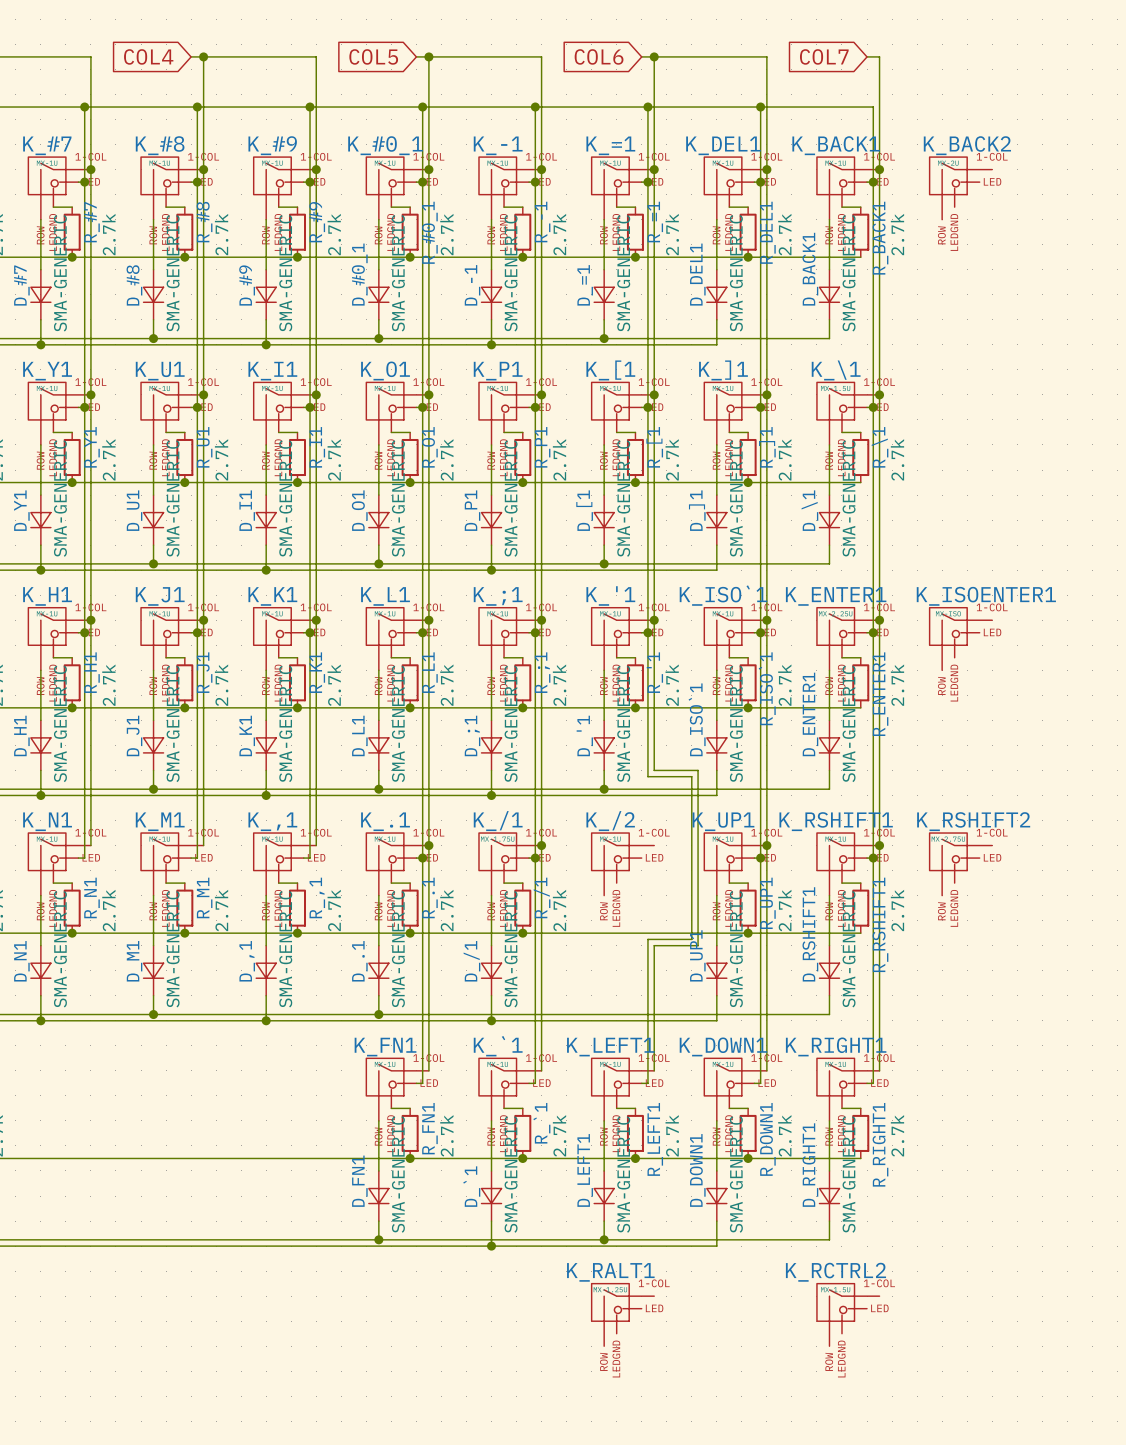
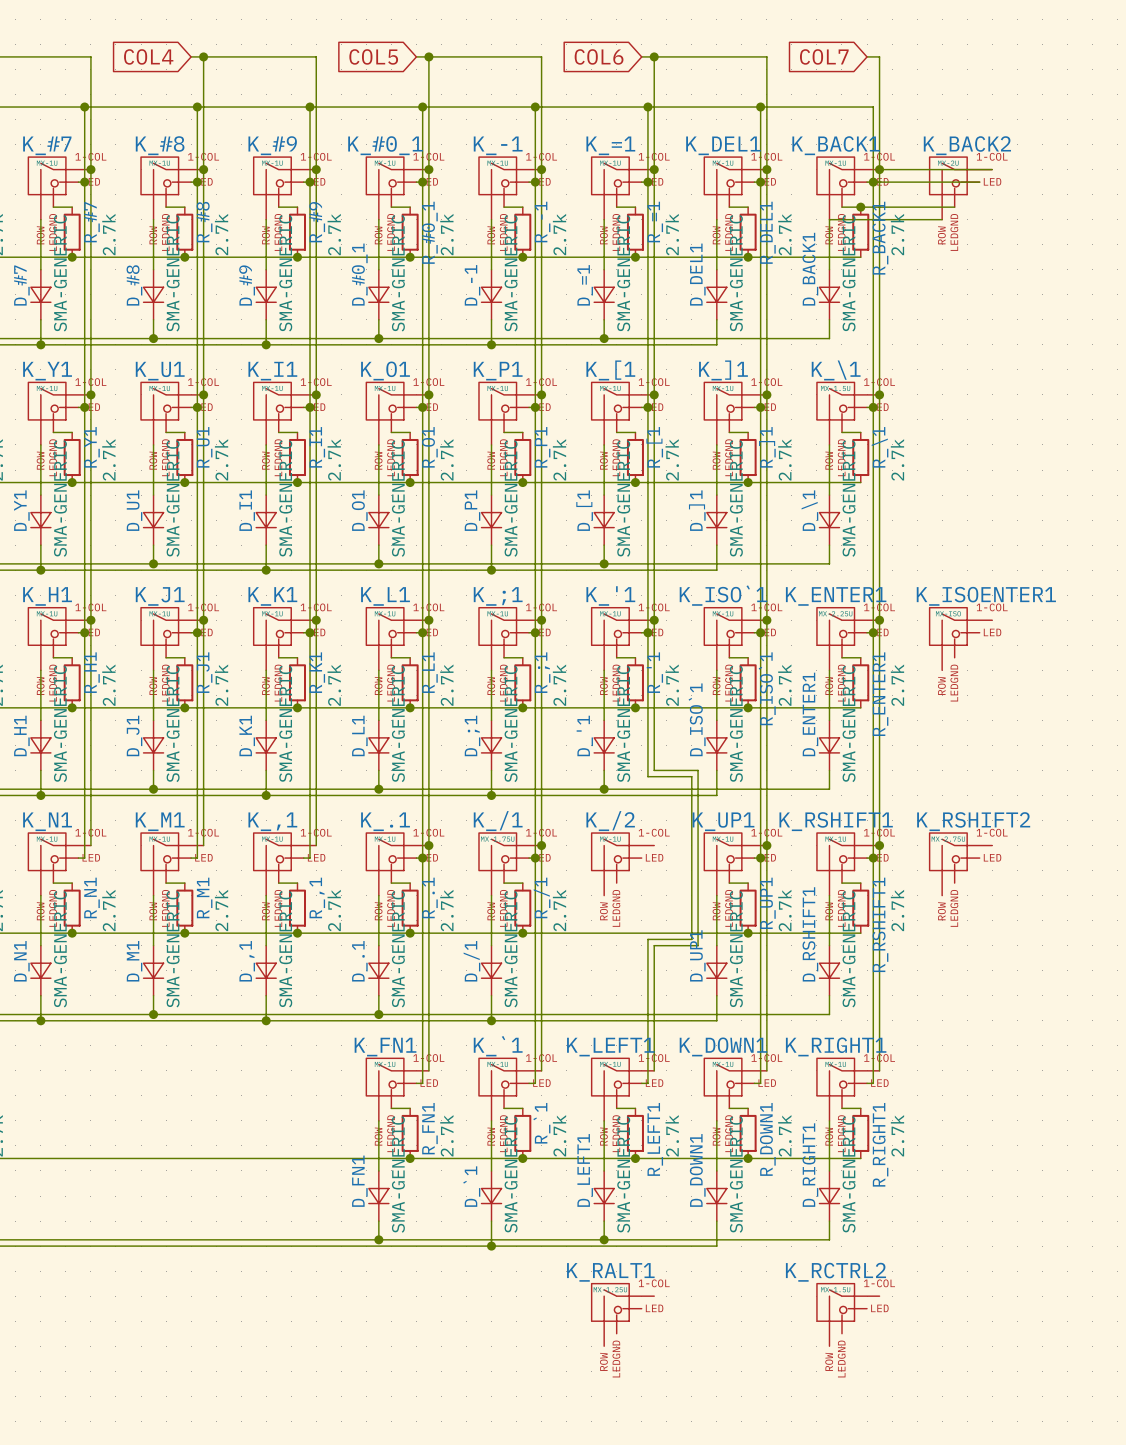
wire: none -> (879, 169) (992, 169)
wire: none -> (873, 182) (979, 182)
wire: none -> (860, 207) (954, 207)
junction: none -> (860, 207)
wire: none -> (829, 219) (942, 219)

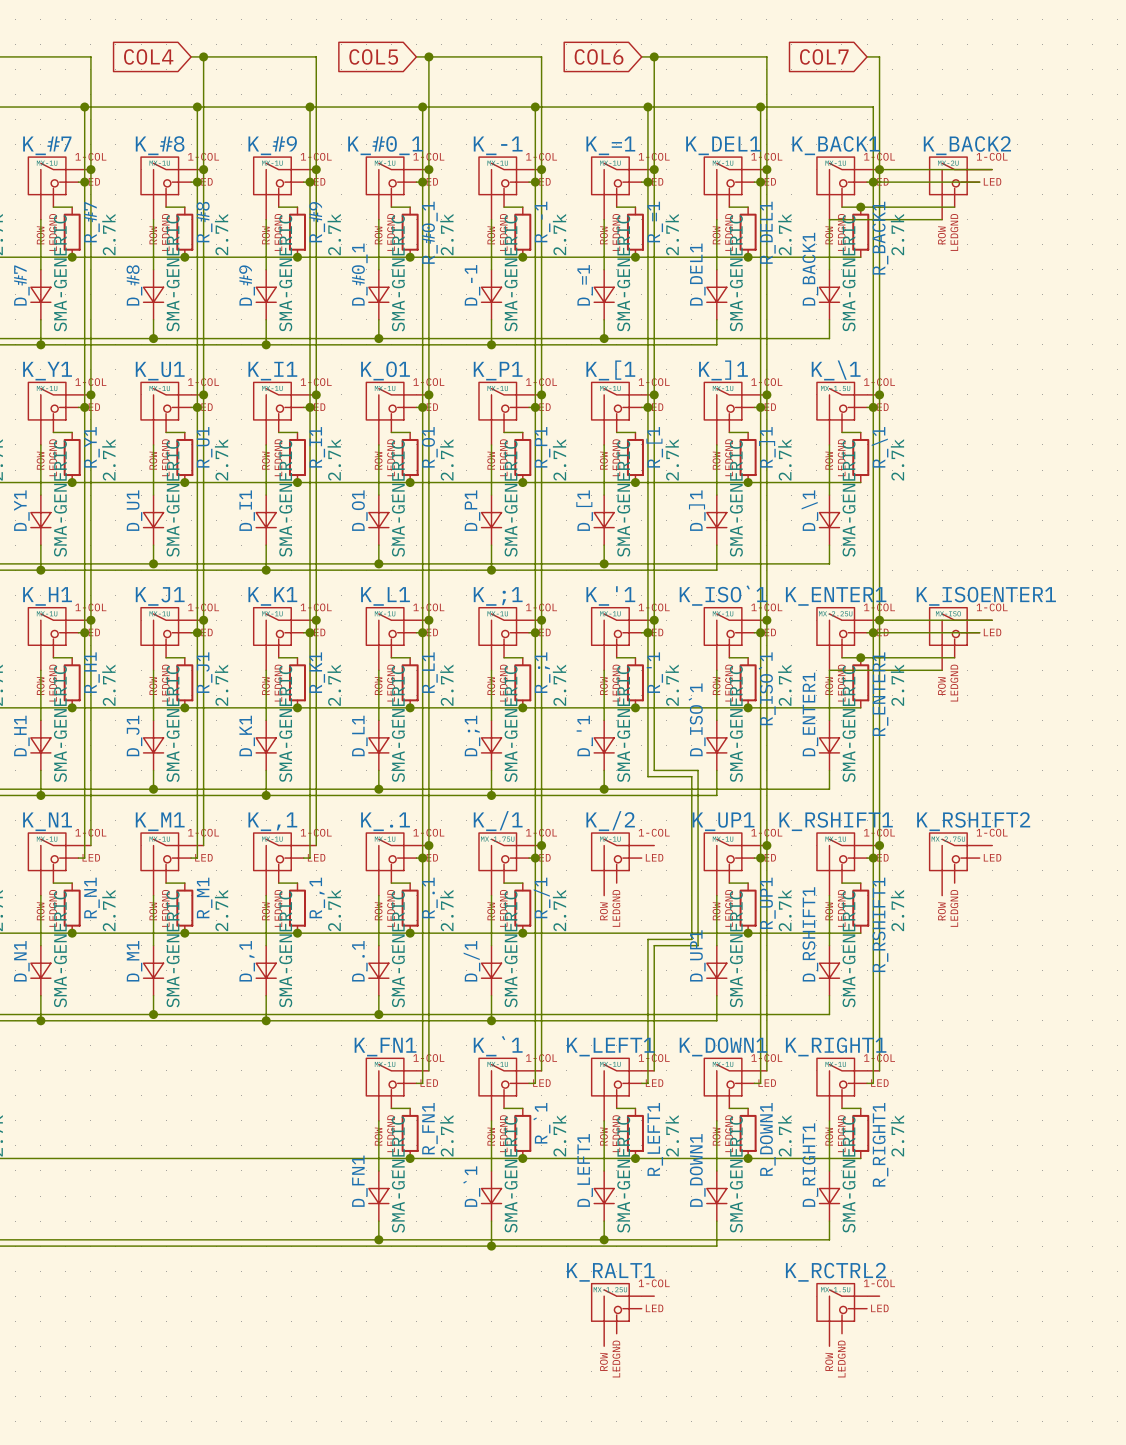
wire: none -> (879, 620) (992, 620)
wire: none -> (873, 632) (979, 632)
wire: none -> (860, 657) (954, 657)
junction: none -> (860, 657)
wire: none -> (829, 670) (942, 670)

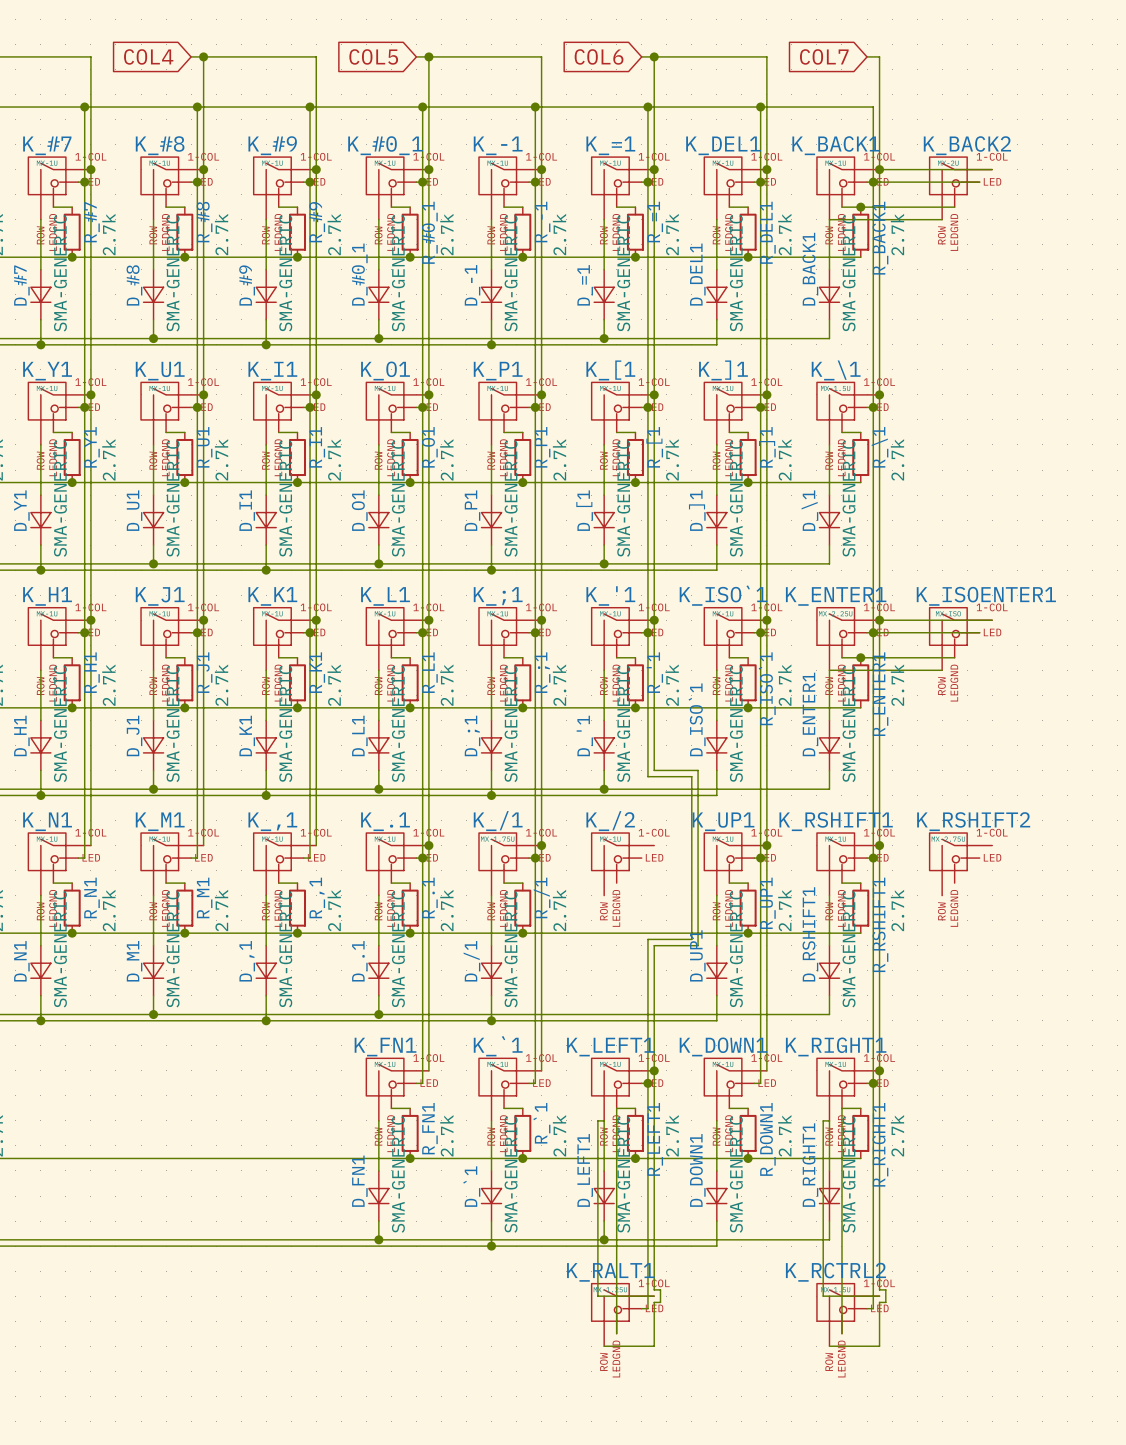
wire: none -> (654, 1070) (654, 1289) (660, 1289) (660, 1302) (654, 1302) (654, 1346) (604, 1346)
junction: none -> (654, 1070)
wire: none -> (879, 1070) (879, 1289) (885, 1289) (885, 1302) (879, 1302) (879, 1346) (829, 1346)
junction: none -> (879, 1070)
wire: none -> (647, 1083) (647, 1308) (641, 1308)
junction: none -> (647, 1083)
wire: none -> (873, 1083) (873, 1308) (867, 1308)
junction: none -> (873, 1083)
wire: none -> (616, 1108) (616, 1333)
wire: none -> (841, 1108) (841, 1333)
wire: none -> (604, 1120) (597, 1120) (597, 1296) (654, 1296)
wire: none -> (829, 1120) (823, 1120) (823, 1296) (879, 1296)

